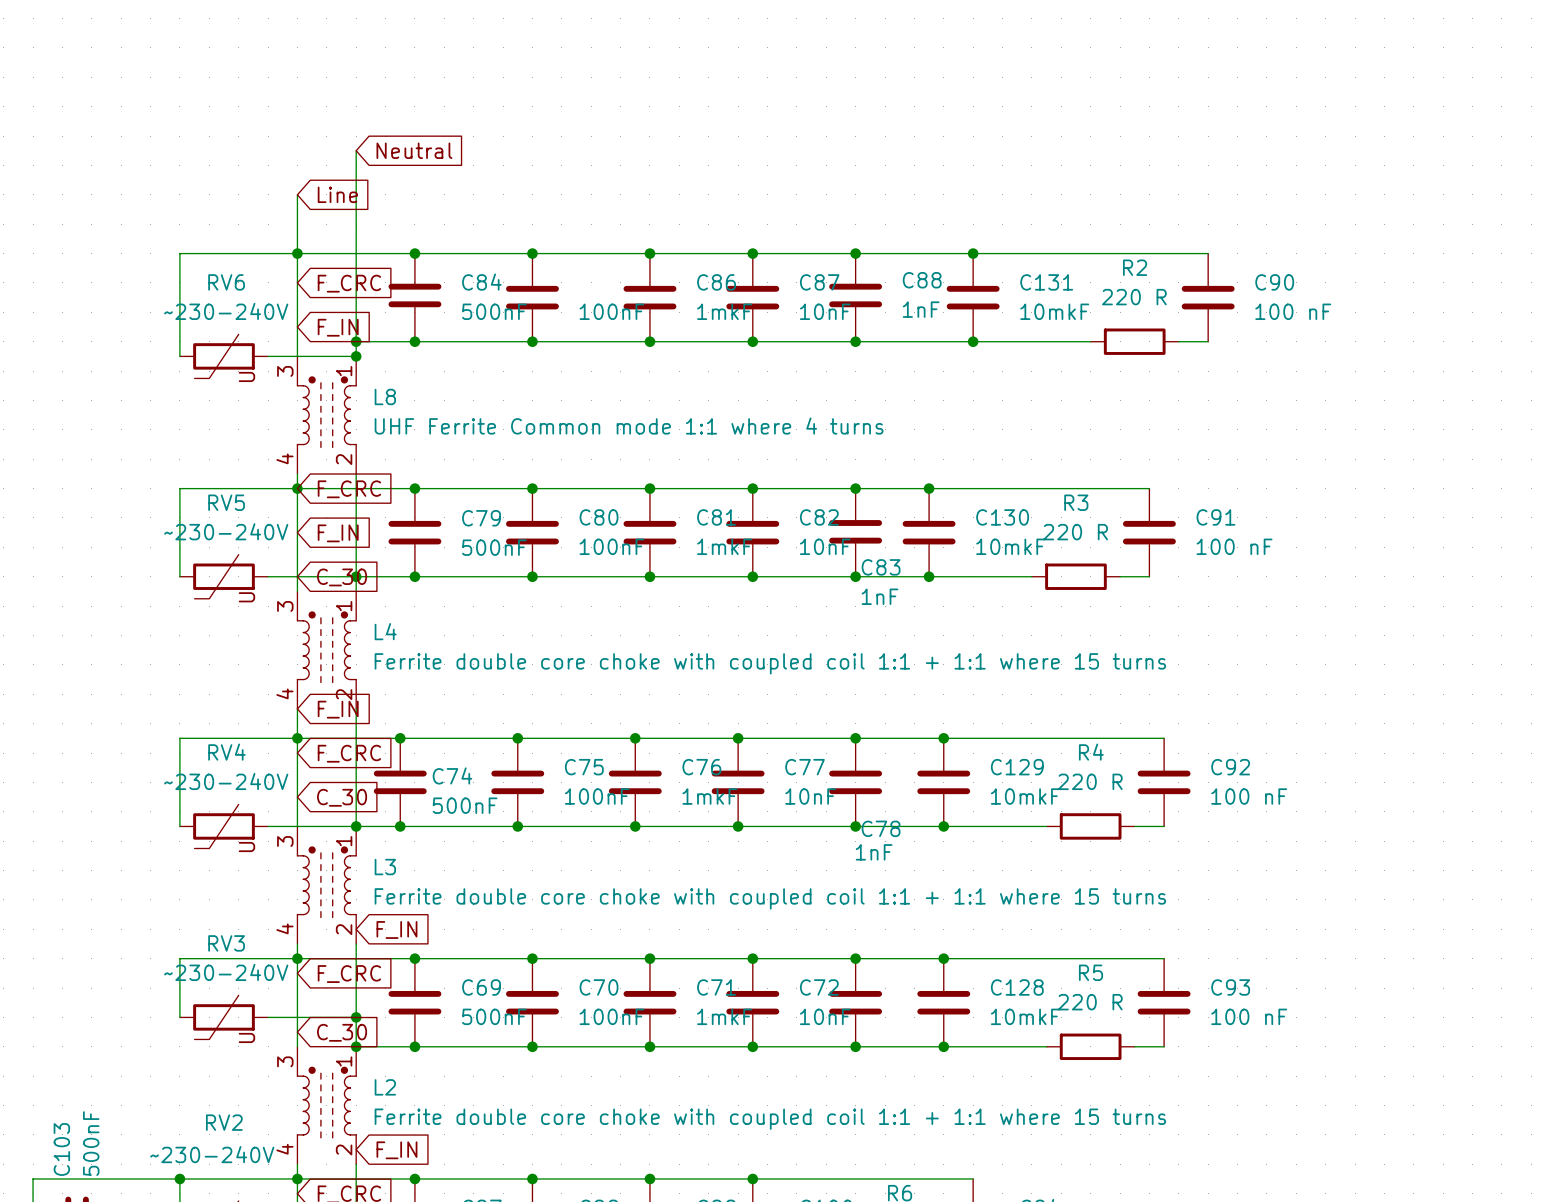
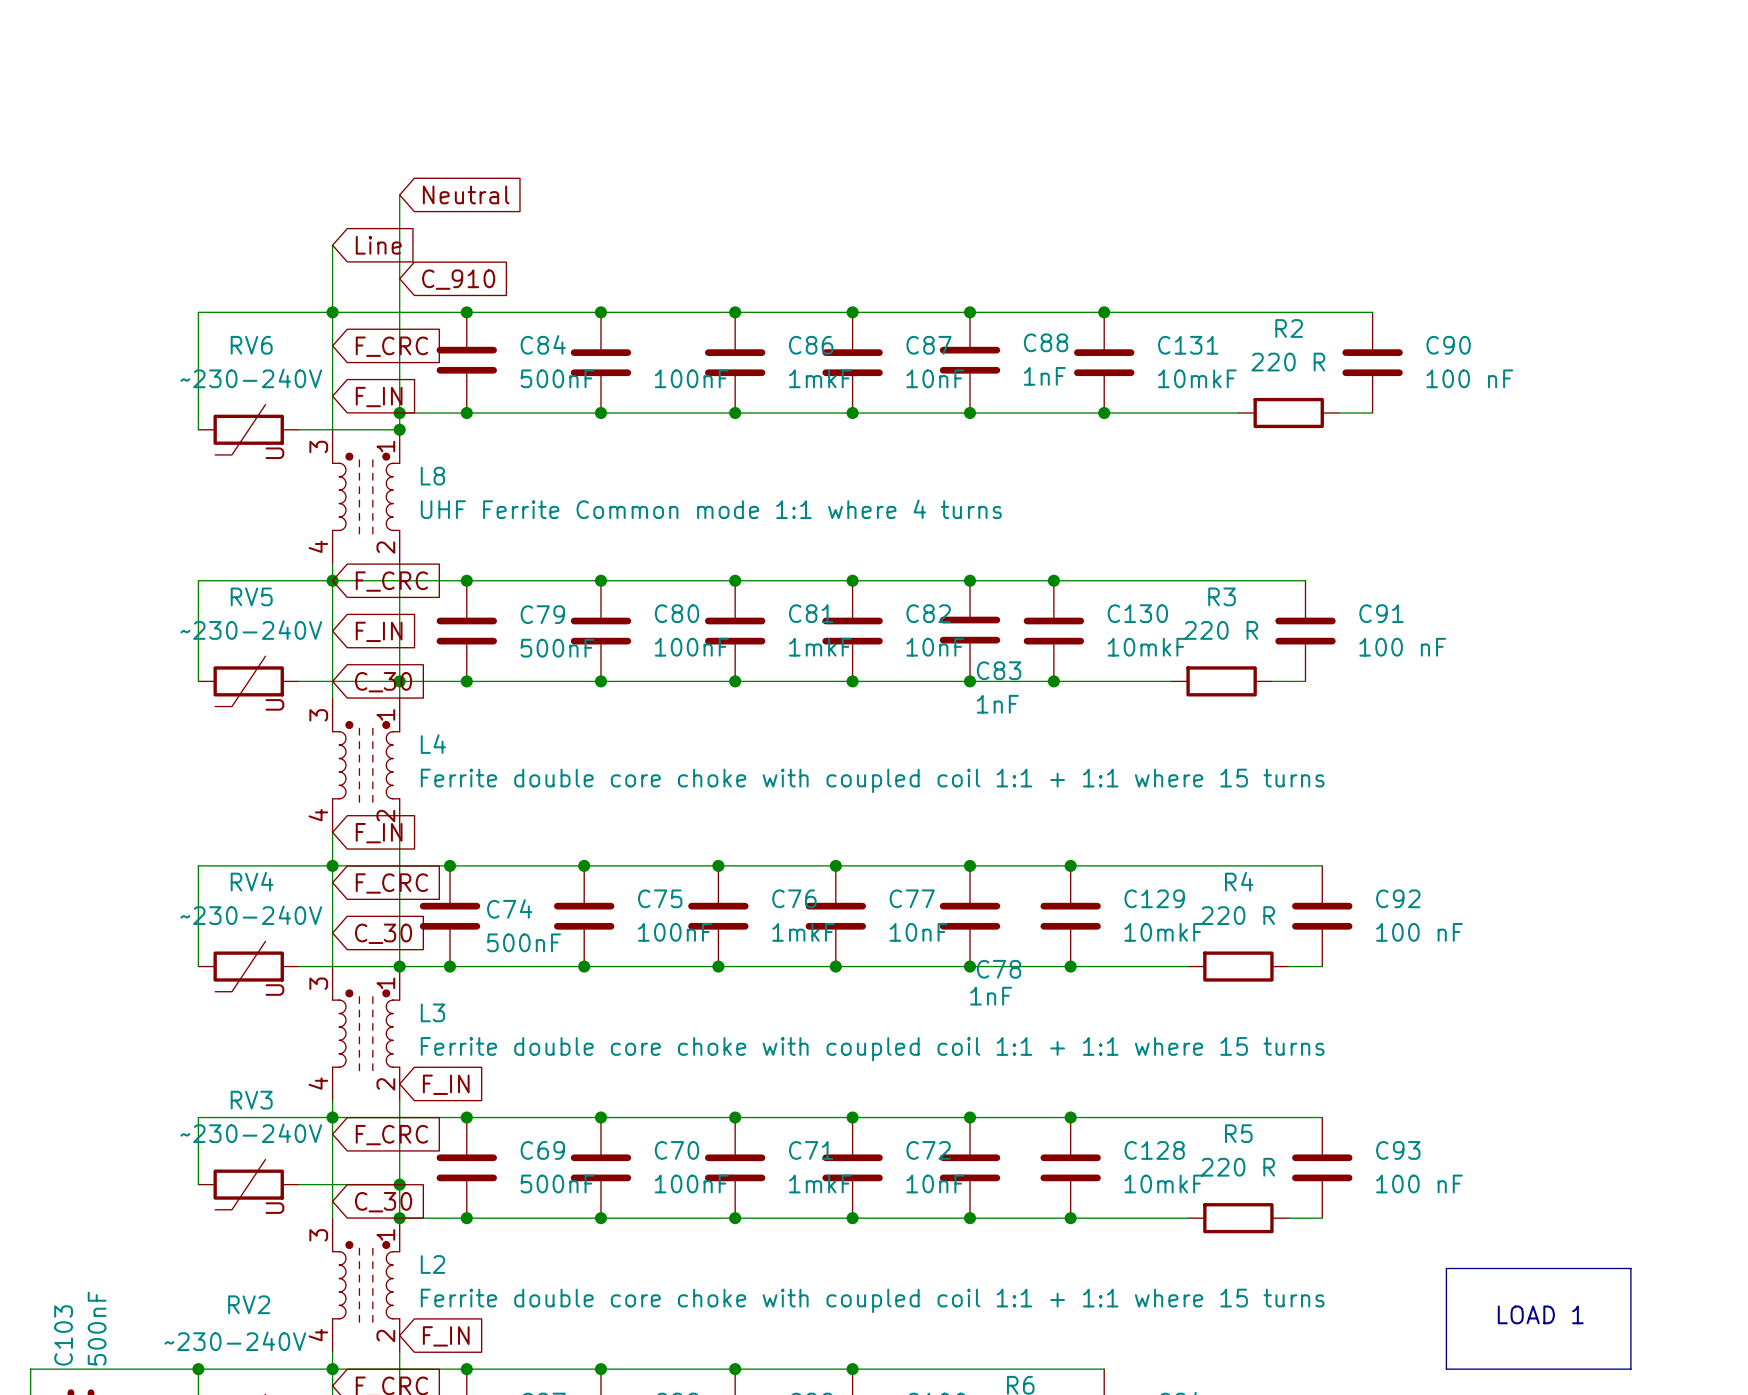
global label: none -> C_910 (458, 279)
line: none -> (1446, 1268) (1630, 1268) (1630, 1369) (1446, 1369) (1446, 1268)
text: none -> LOAD 1 (1540, 1314)

